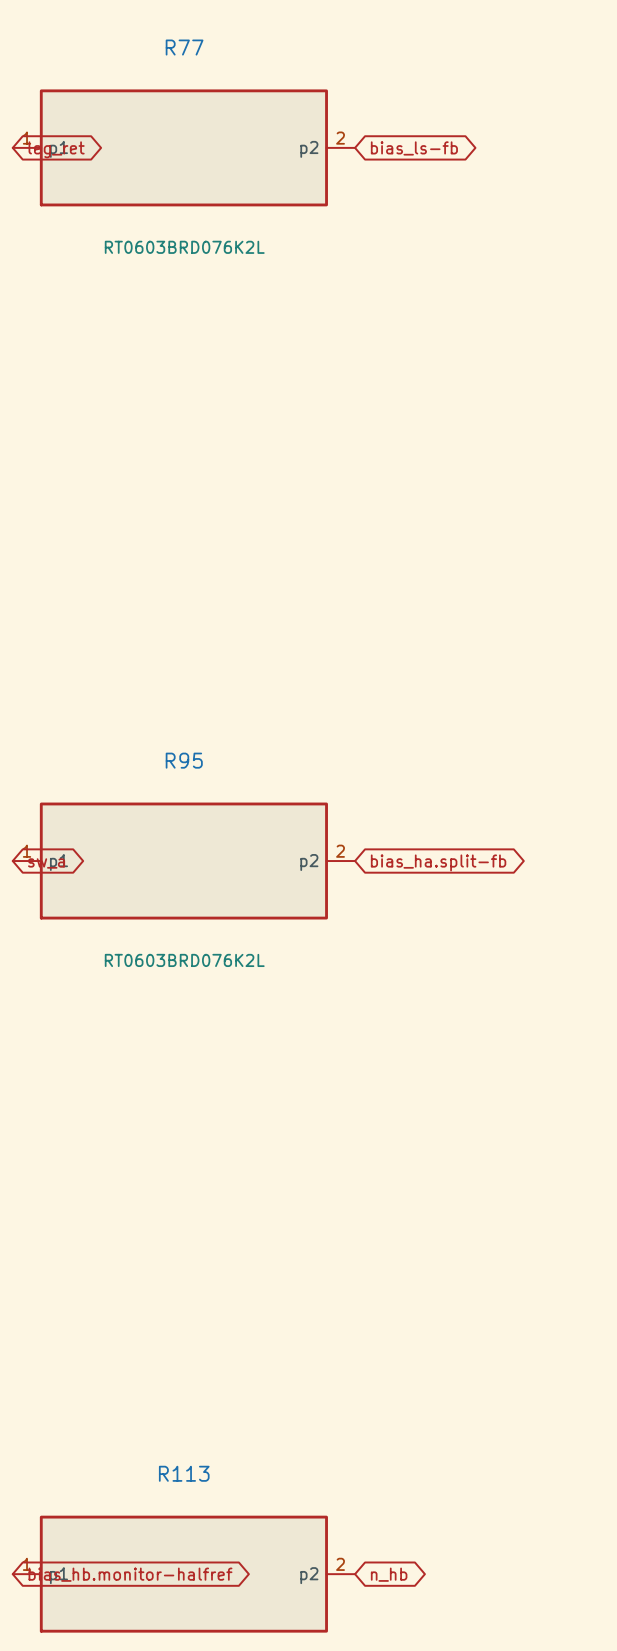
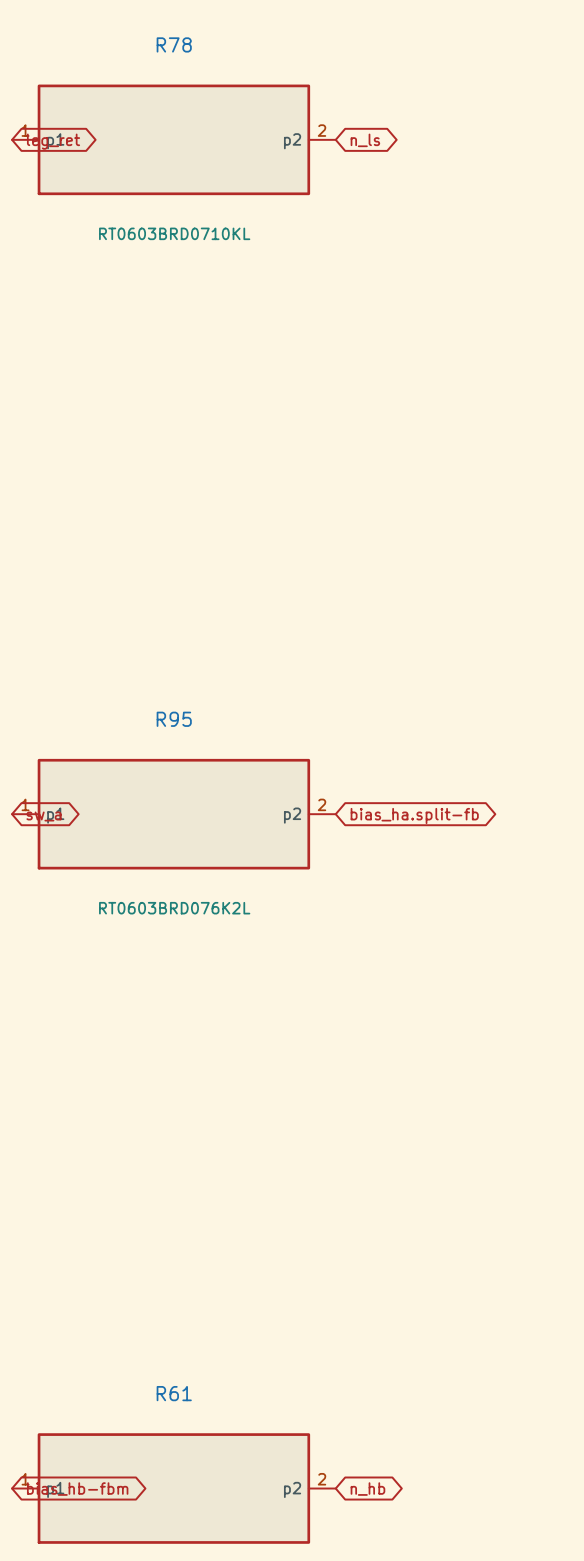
R77 name: R77 (184, 47) -> R78 (174, 44)
global label: bias_ls-fb (414, 148) -> n_ls (365, 140)
R77 value: RT0603BRD076K2L (184, 247) -> RT0603BRD0710KL (174, 233)
R113 name: R113 (184, 1473) -> R61 (174, 1393)
global label: bias_hb.monitor-halfref (130, 1574) -> bias_hb-fbm (77, 1489)

